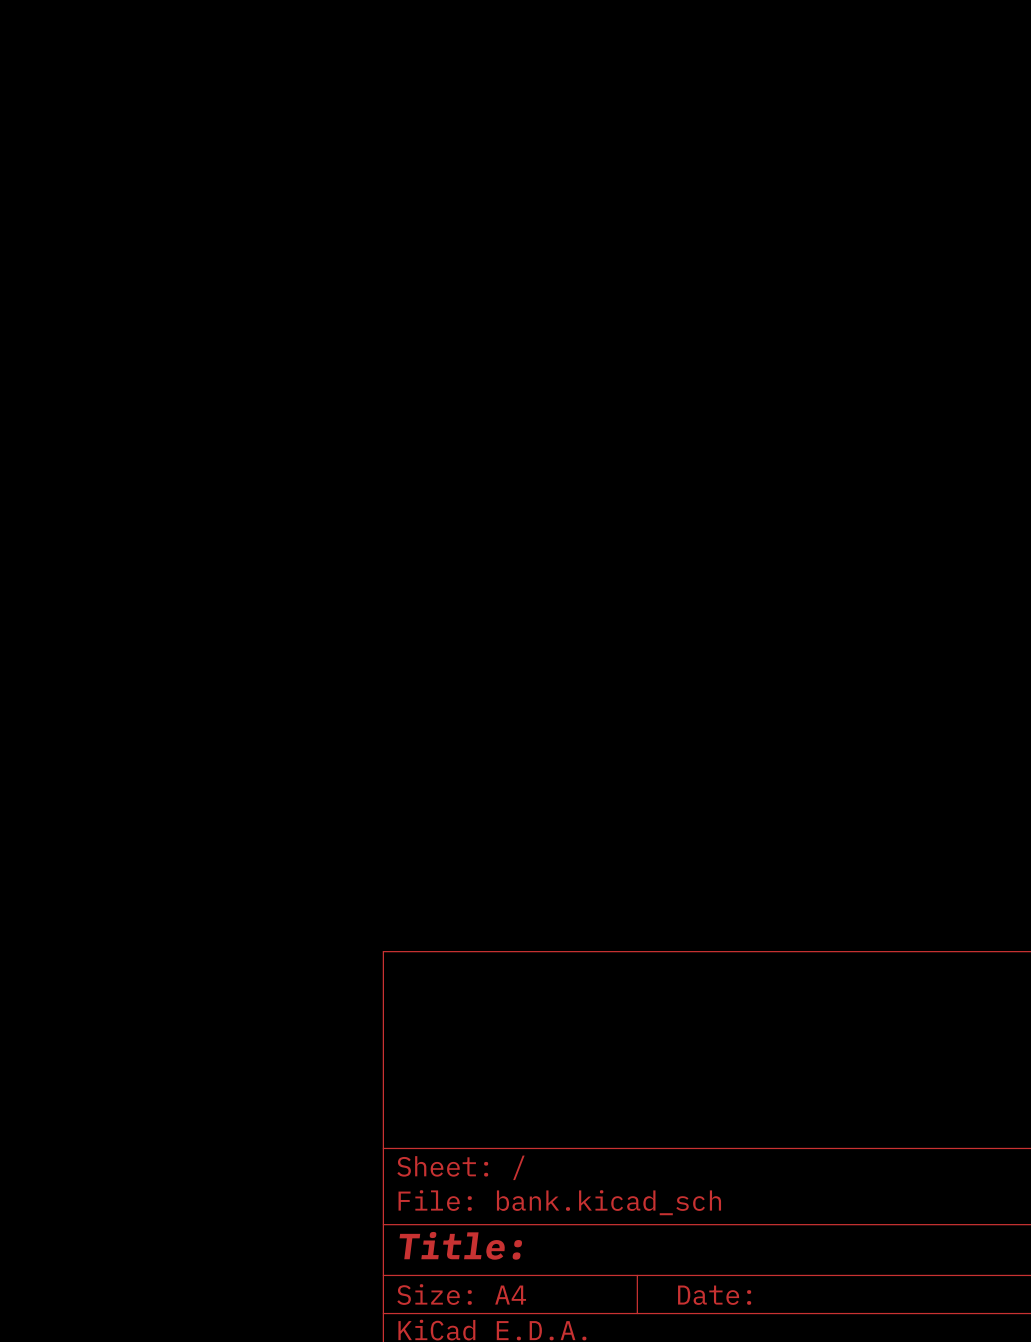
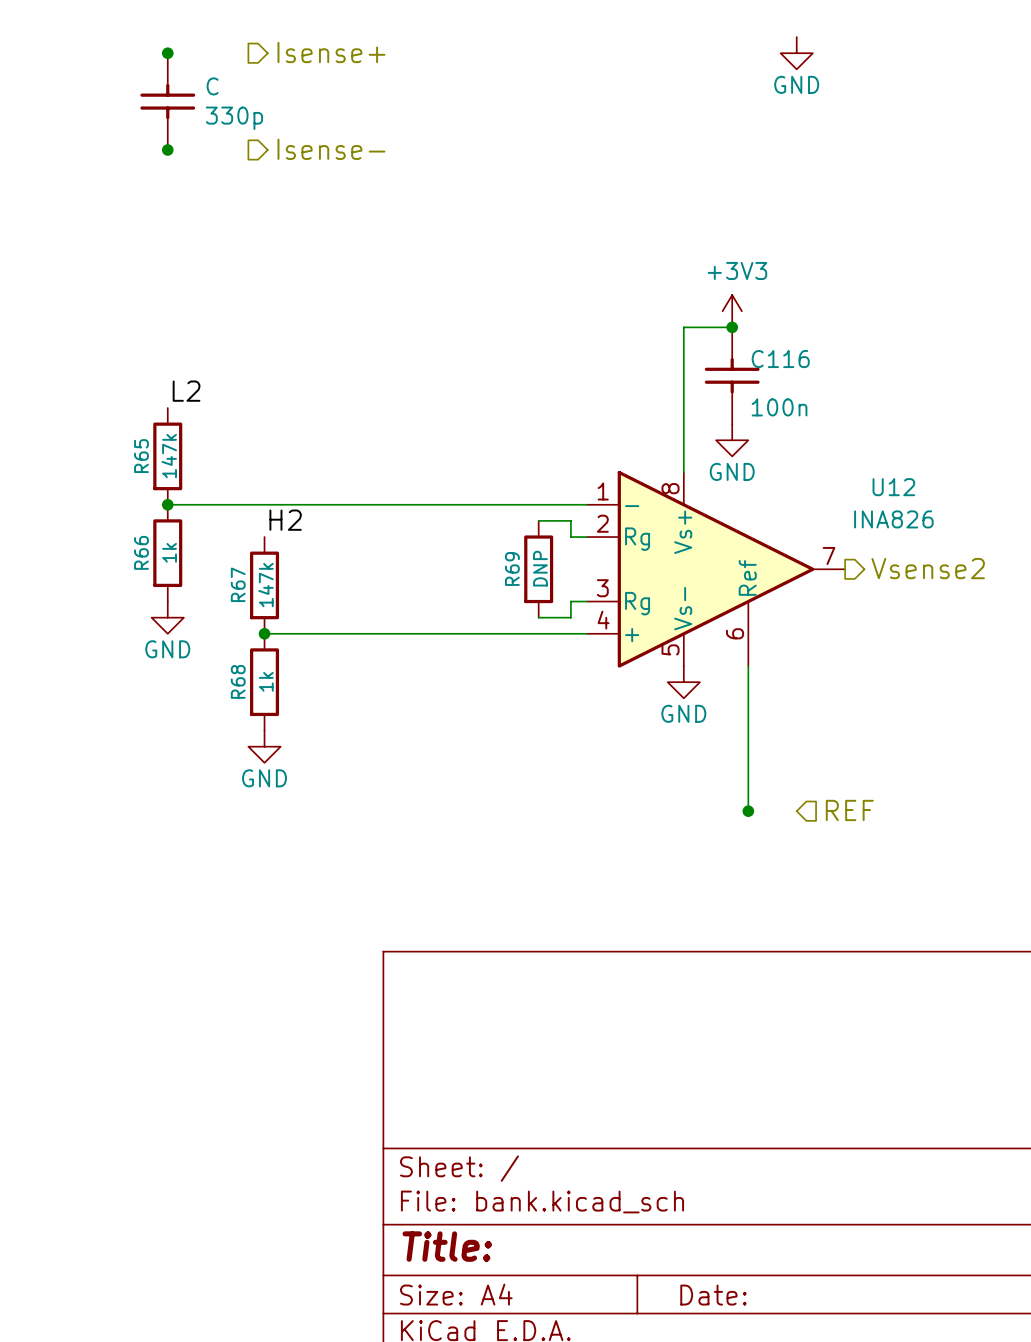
hierarchical label: none -> Isense+ (331, 52)
junction: none -> (167, 53)
power symbol: none -> GND (796, 53)
C: none -> 330p (167, 101)
junction: none -> (167, 149)
hierarchical label: none -> Isense- (331, 149)
power symbol: none -> +3V3 (732, 311)
wire: none -> (732, 327) (683, 327) (683, 472)
junction: none -> (732, 327)
C116: none -> 100n (732, 375)
label: none -> L2 (186, 391)
power symbol: none -> GND (732, 440)
R65: none -> 147k (167, 456)
wire: none -> (167, 504) (587, 504)
junction: none -> (167, 504)
label: none -> H2 (285, 520)
wire: none -> (538, 520) (570, 520) (570, 537) (587, 537)
R66: none -> 1k (167, 553)
hierarchical label: none -> Vsense2 (928, 568)
R69: none -> DNP (538, 569)
U12: none -> INA826 (716, 569)
R67: none -> 147k (264, 585)
wire: none -> (587, 601) (570, 601) (570, 617) (538, 617)
power symbol: none -> GND (167, 617)
wire: none -> (264, 633) (587, 633)
junction: none -> (264, 633)
wire: none -> (748, 666) (748, 811)
R68: none -> 1k (264, 682)
power symbol: none -> GND (683, 682)
power symbol: none -> GND (264, 746)
hierarchical label: none -> REF (849, 810)
junction: none -> (748, 811)

